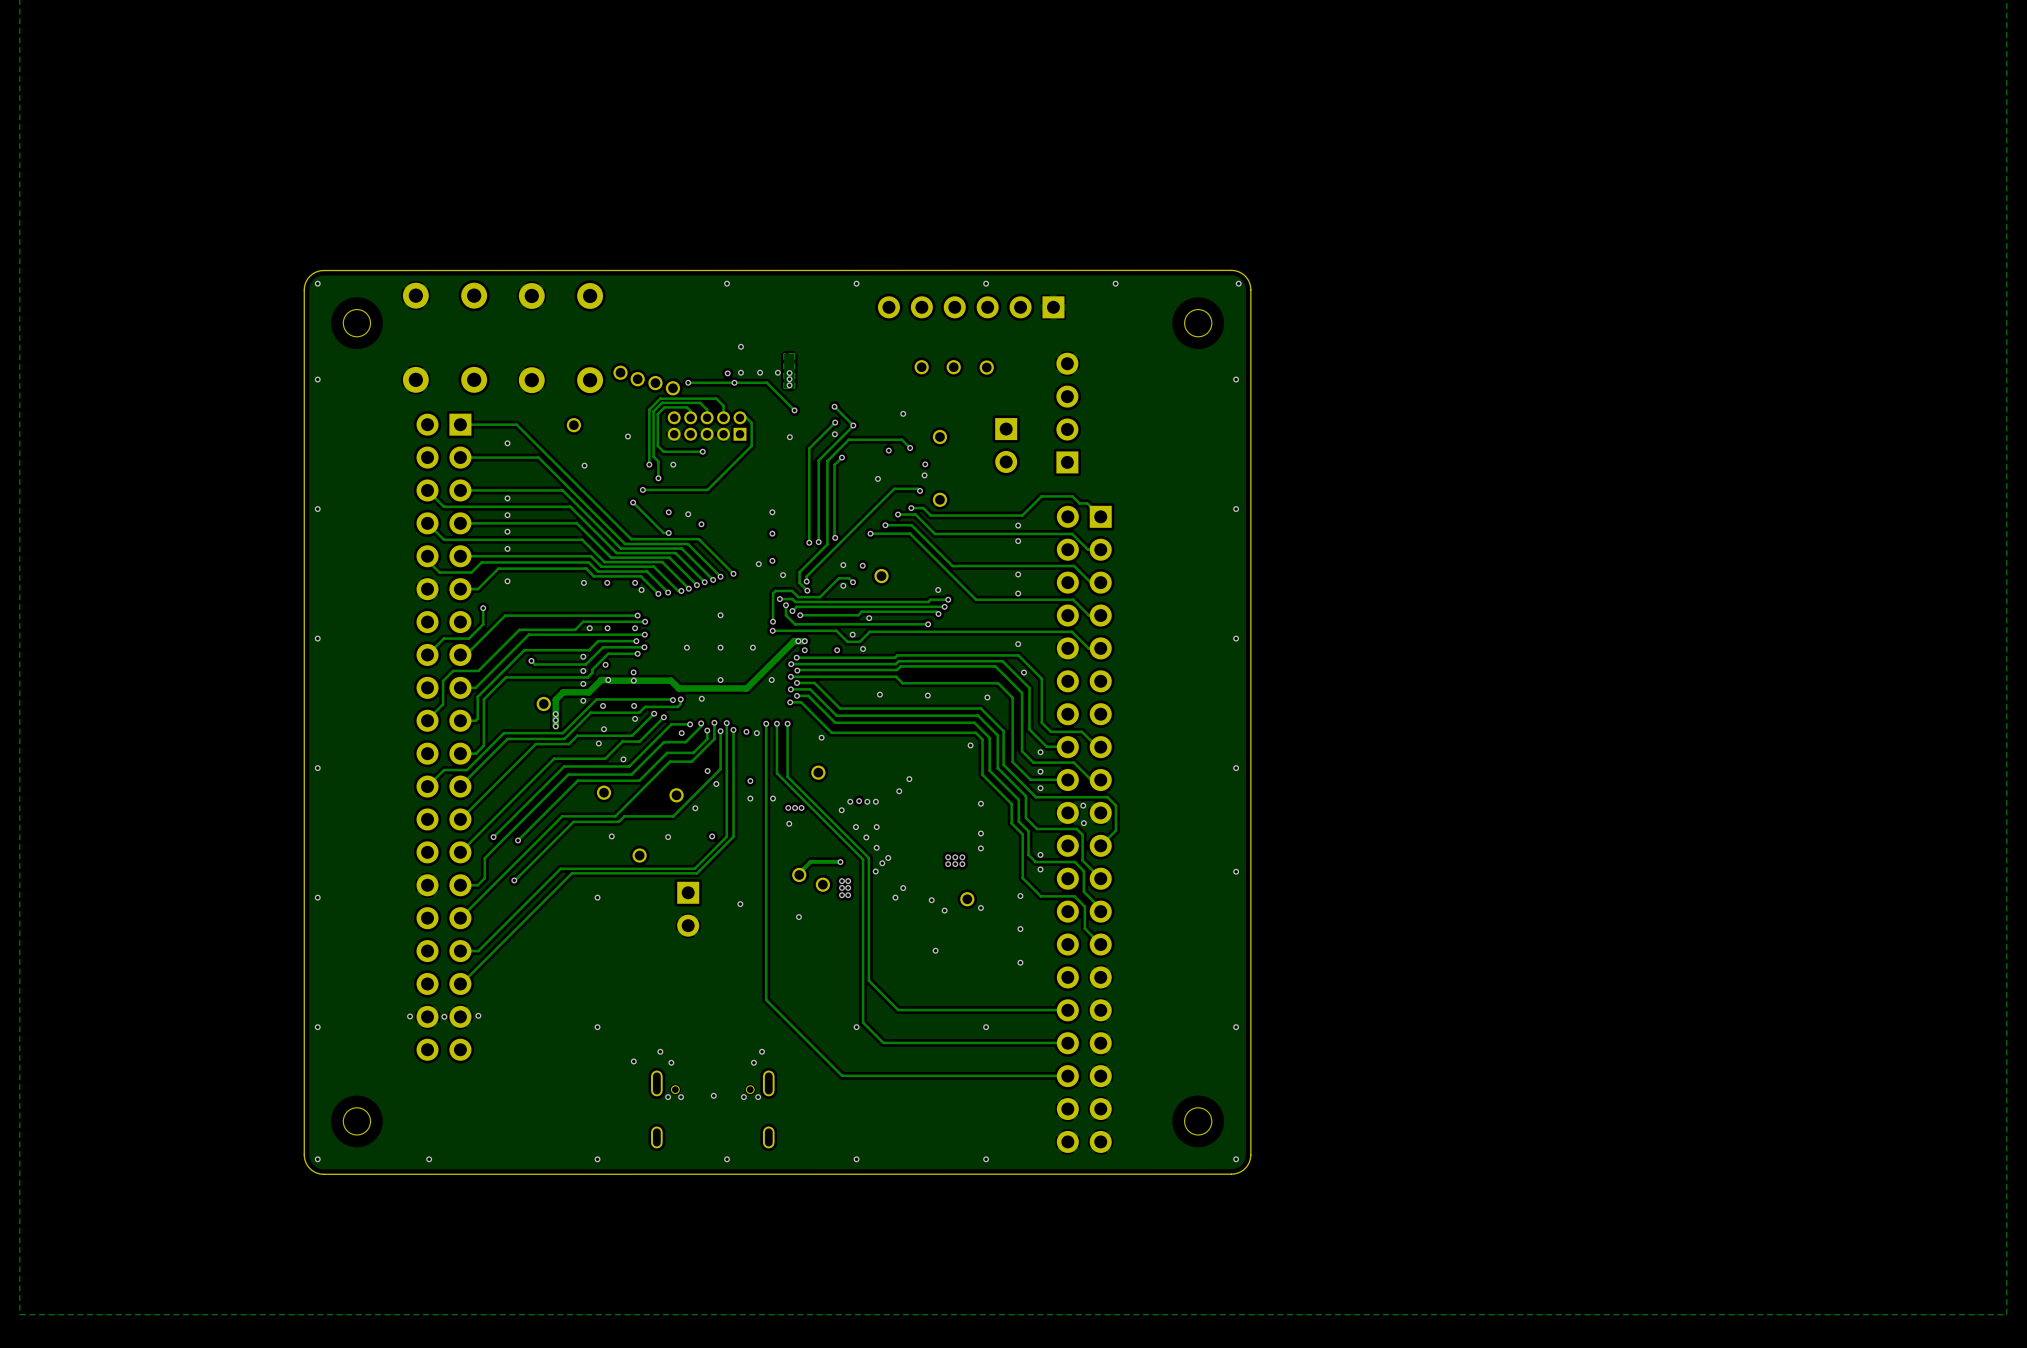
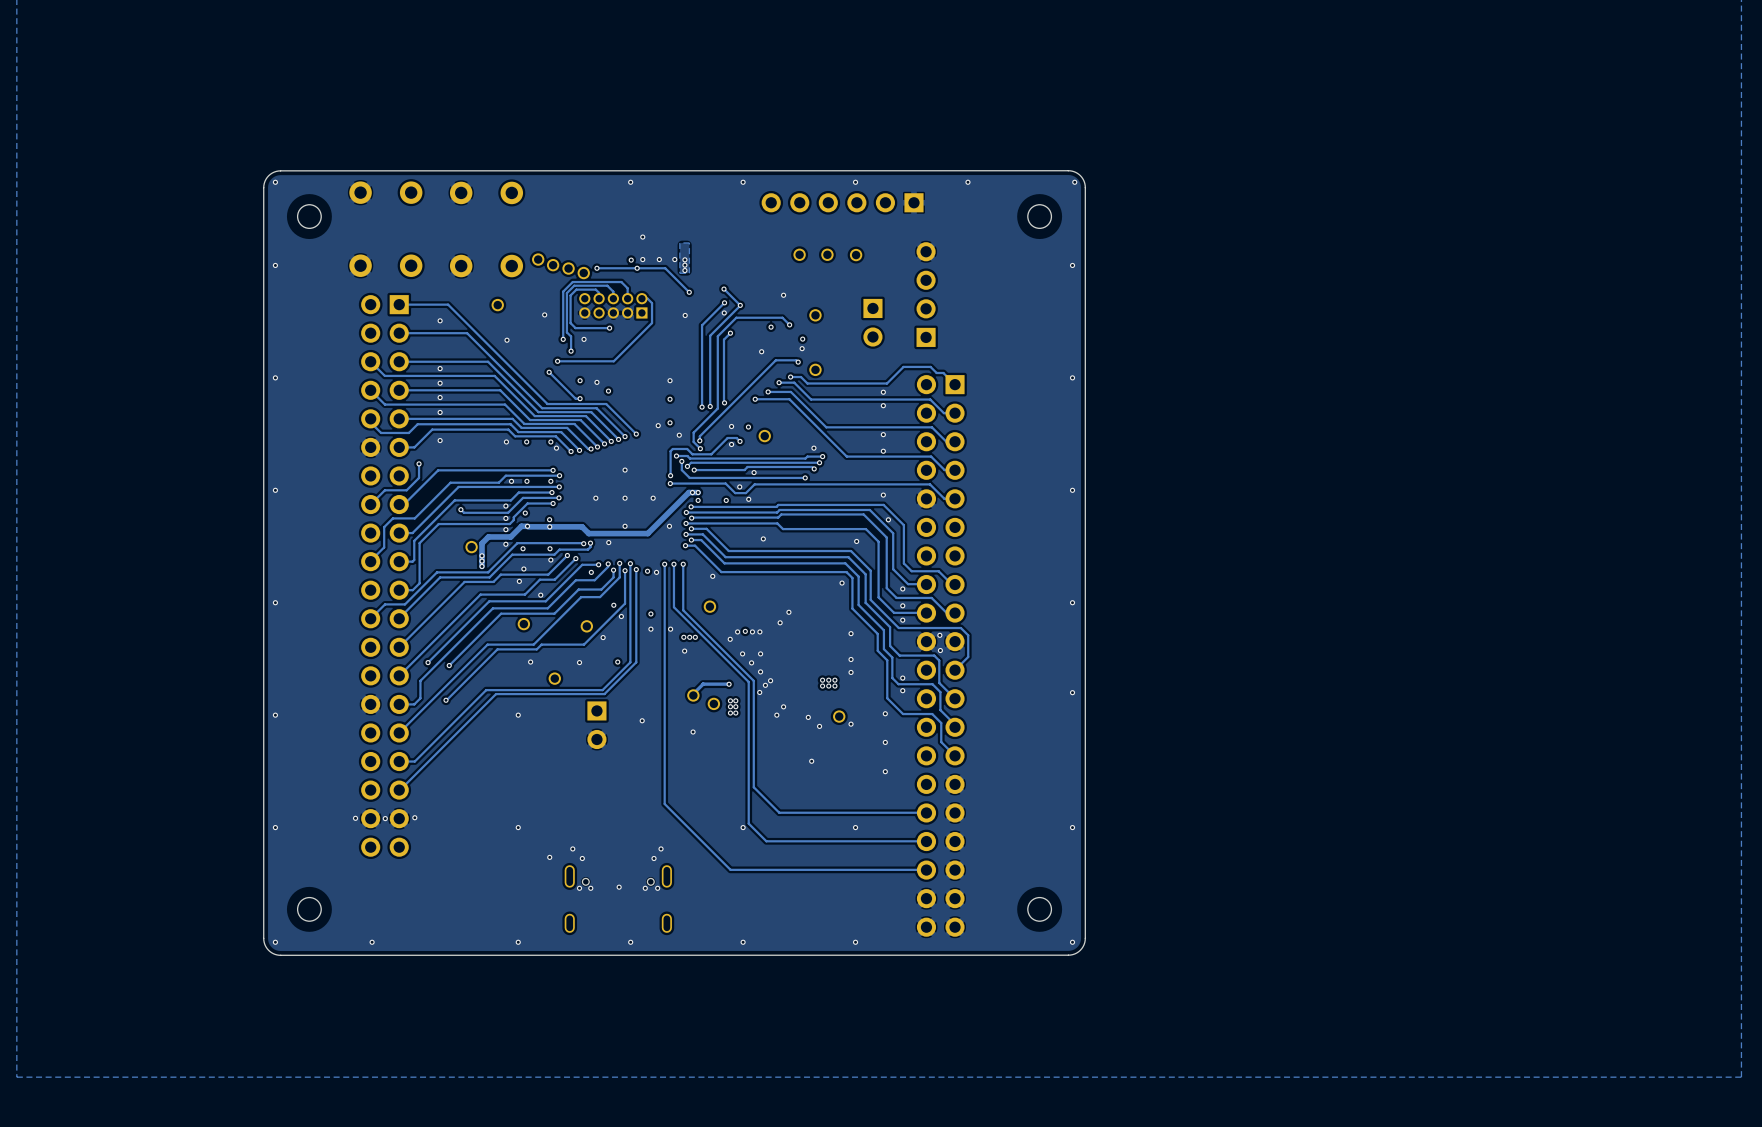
via: (927, 695) -> none

